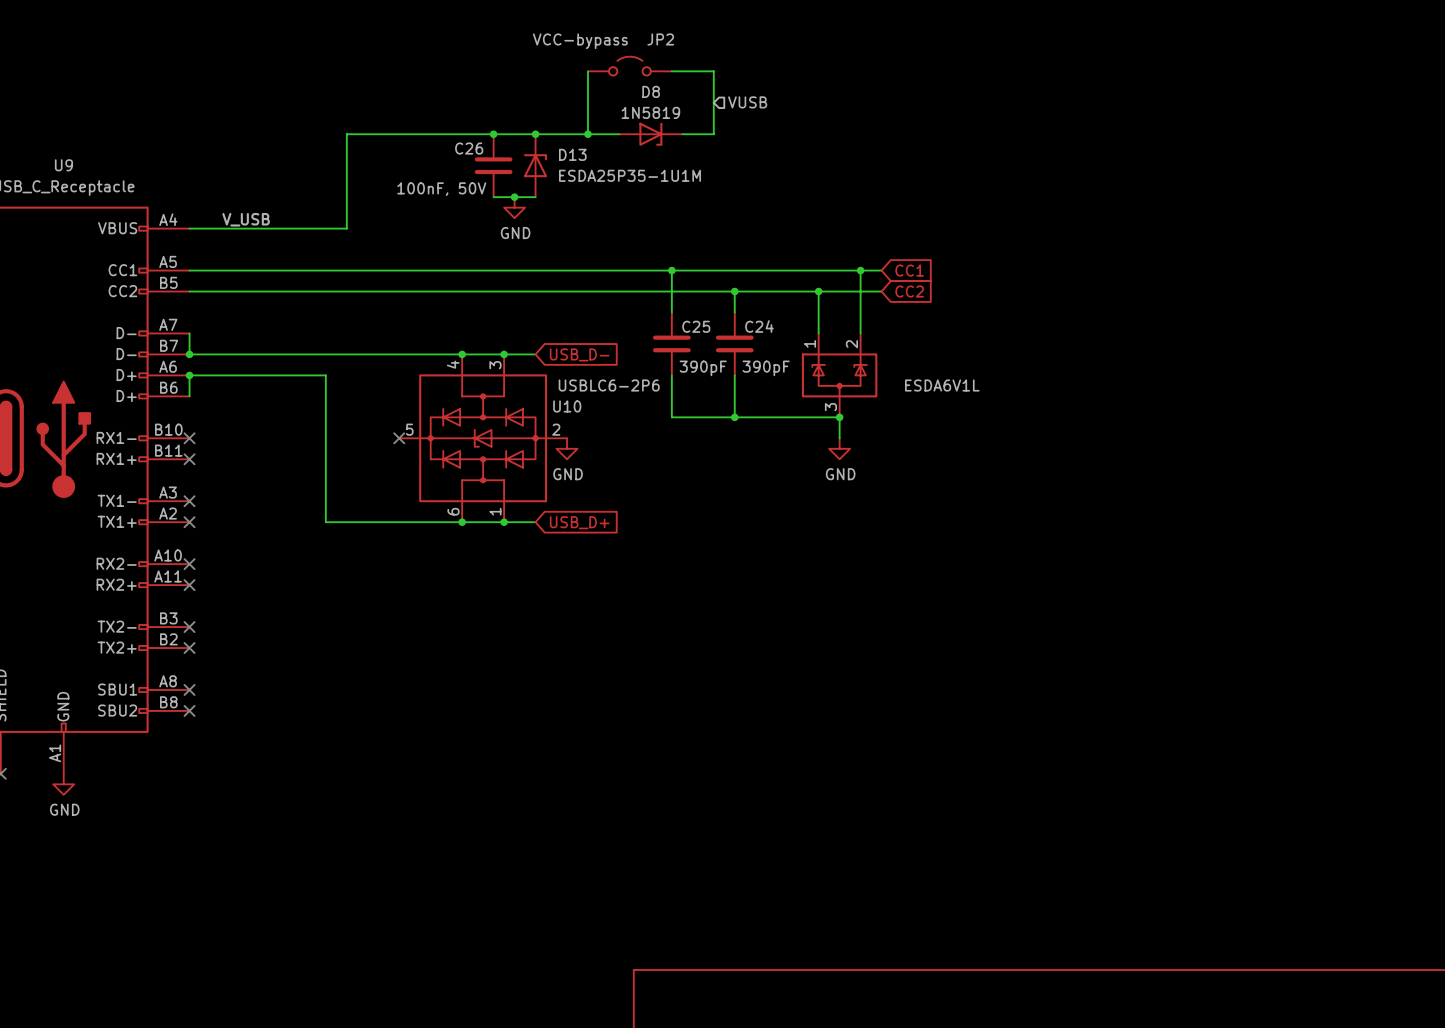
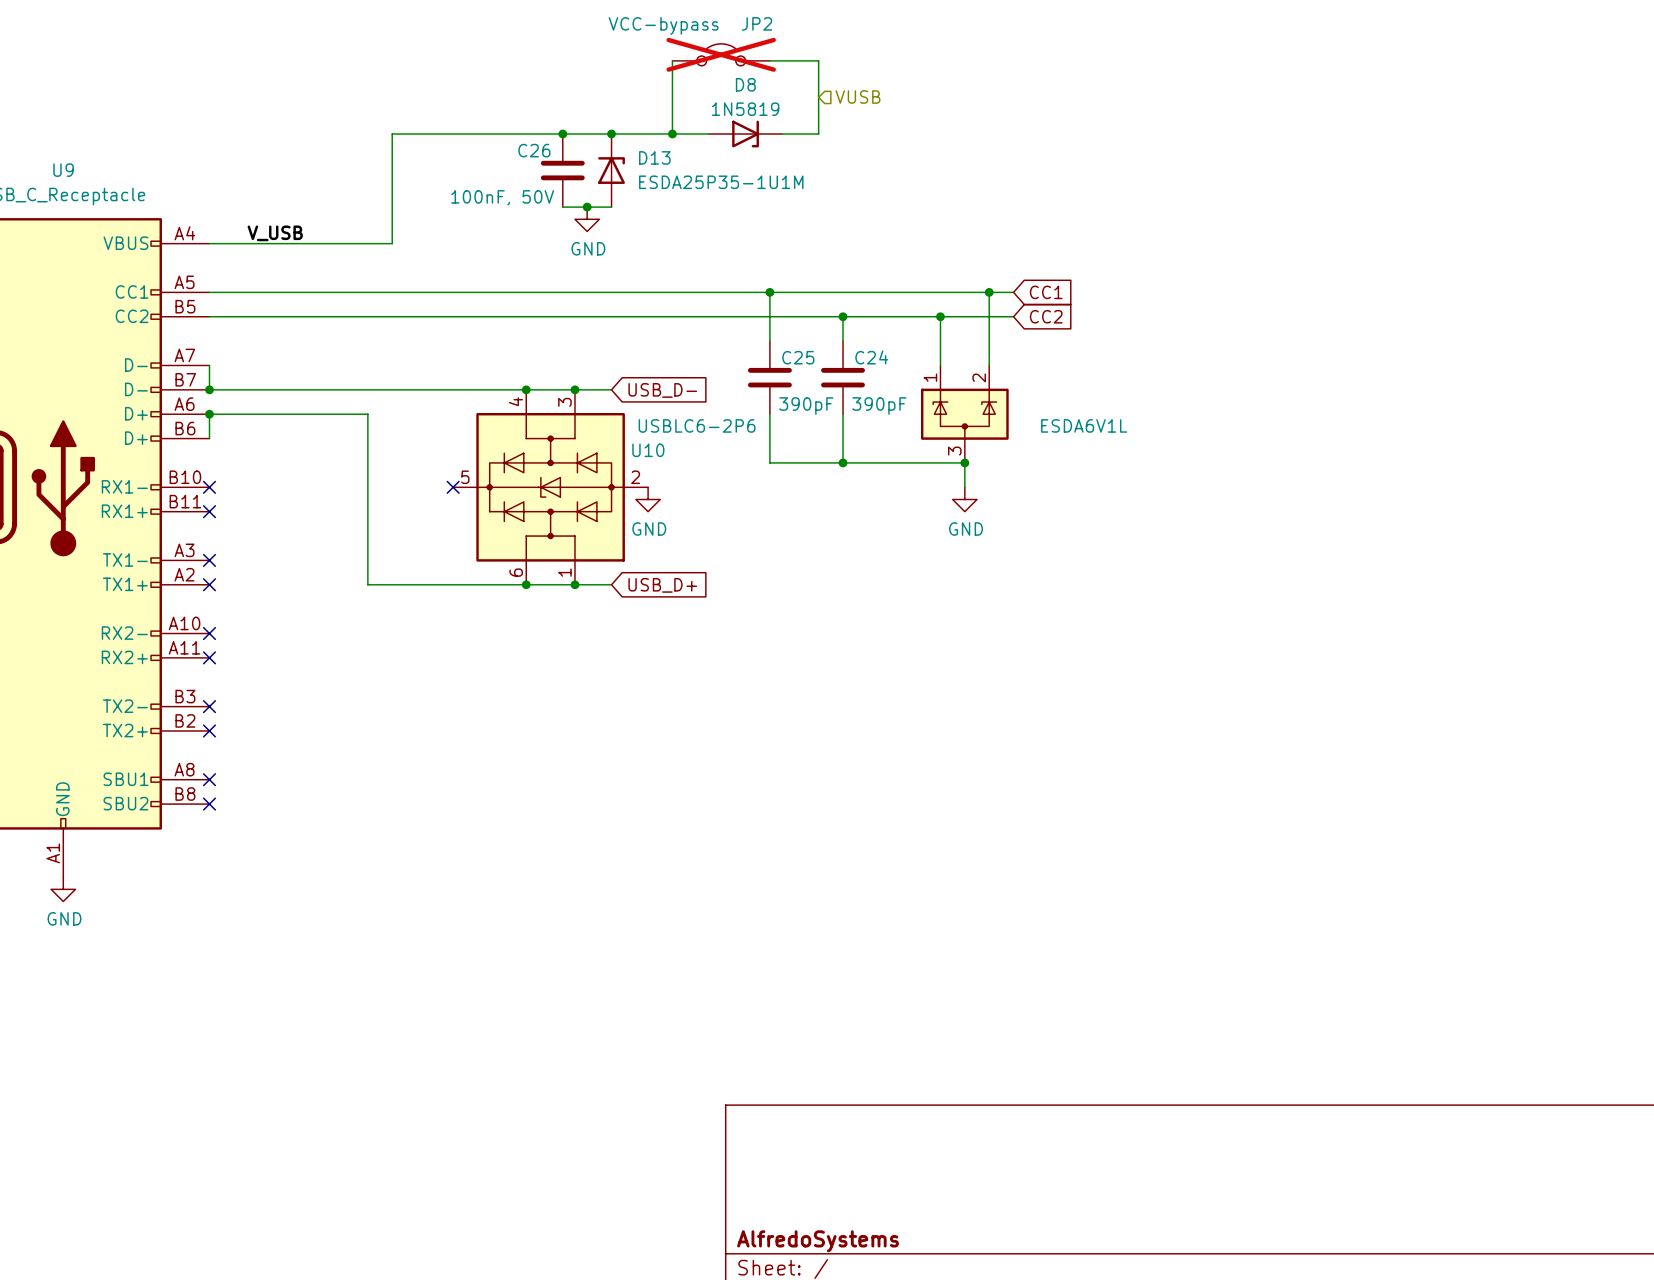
JP2 do-not-place cross: none -> (721, 54)

